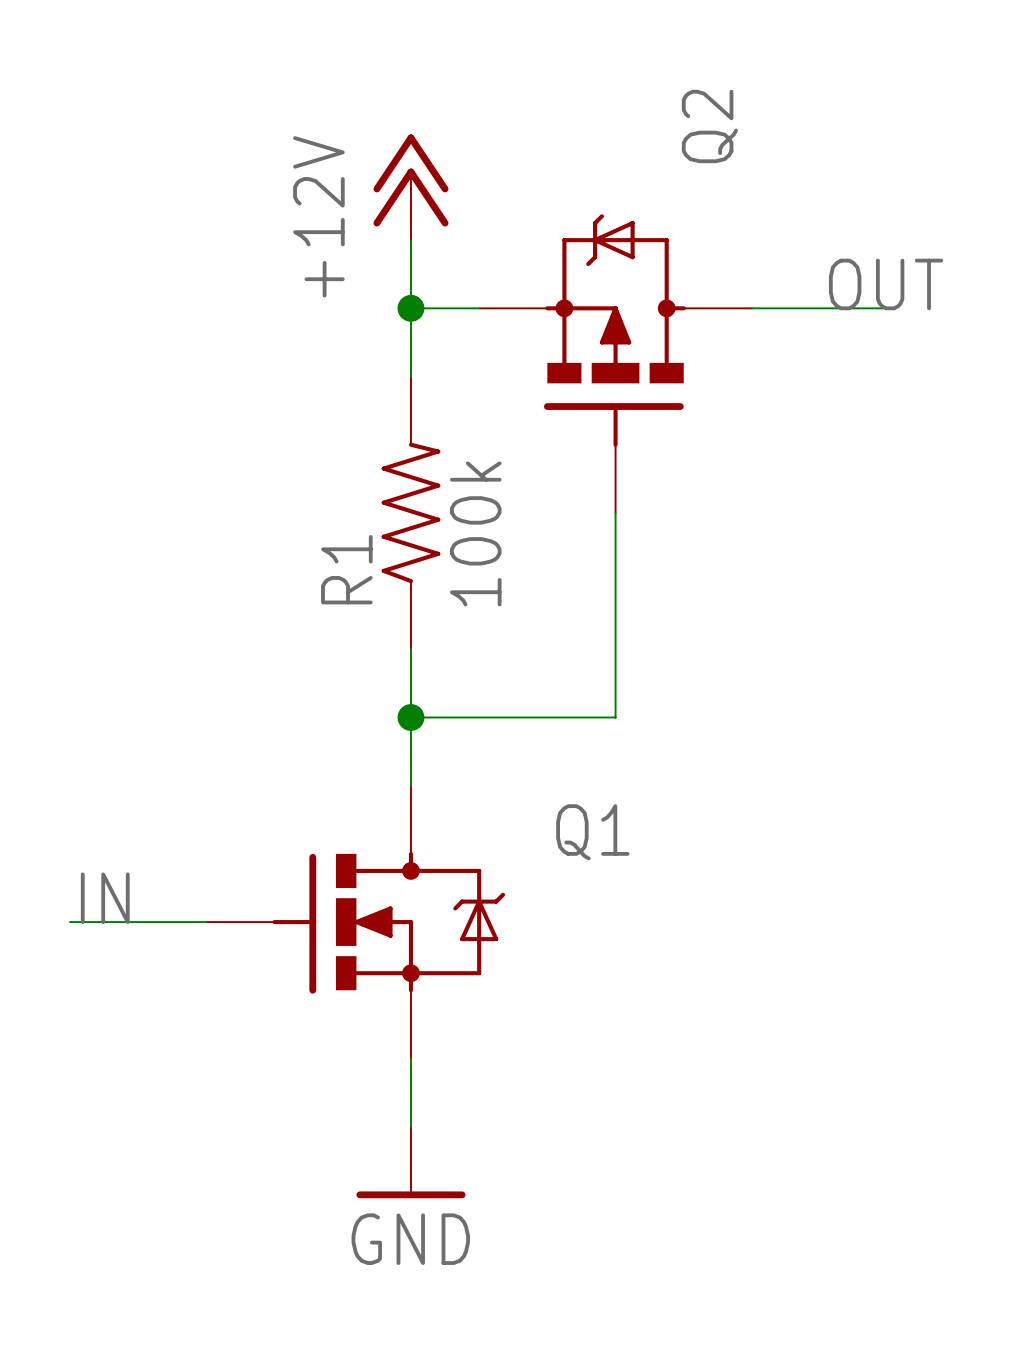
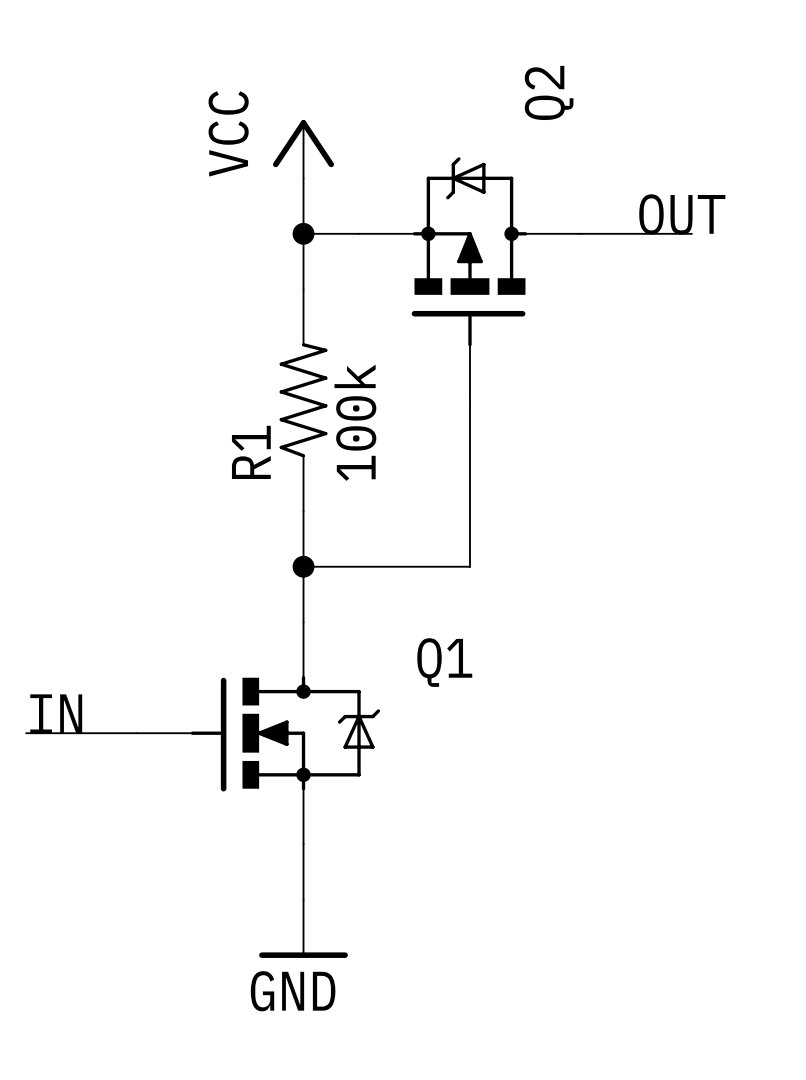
power symbol: +12V (410, 187) -> VCC (303, 149)

